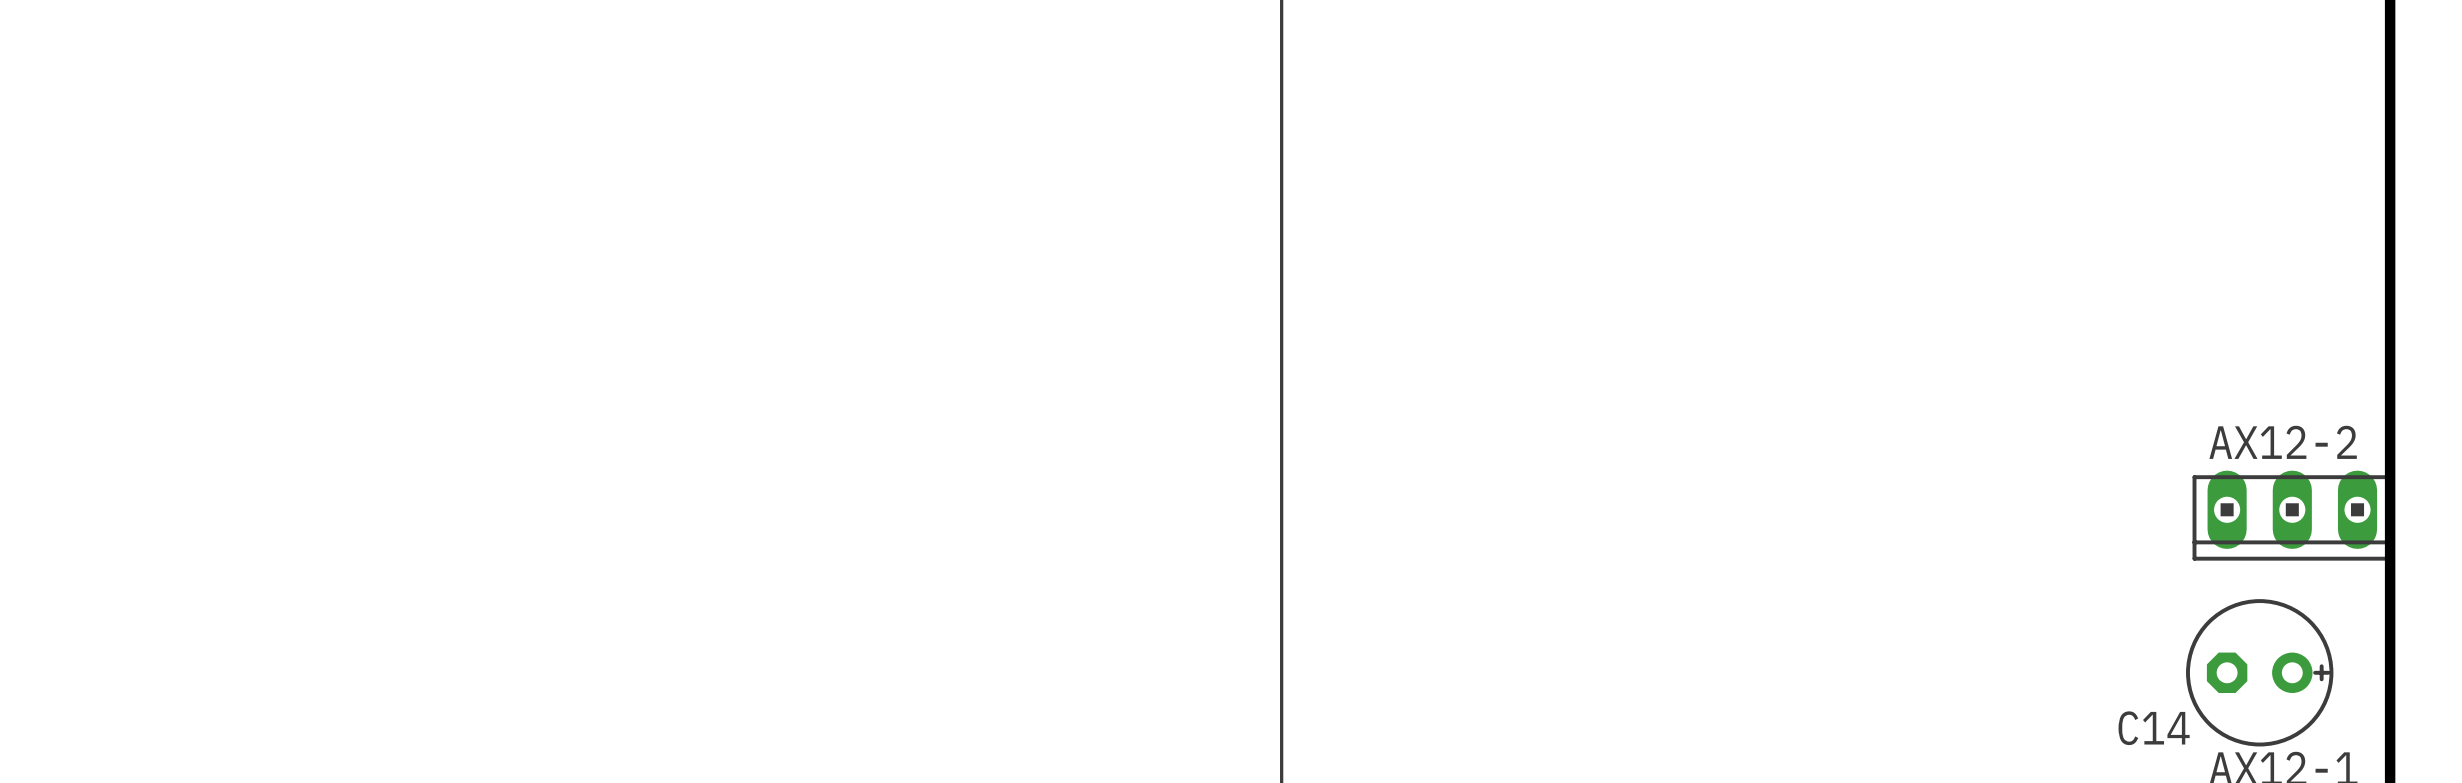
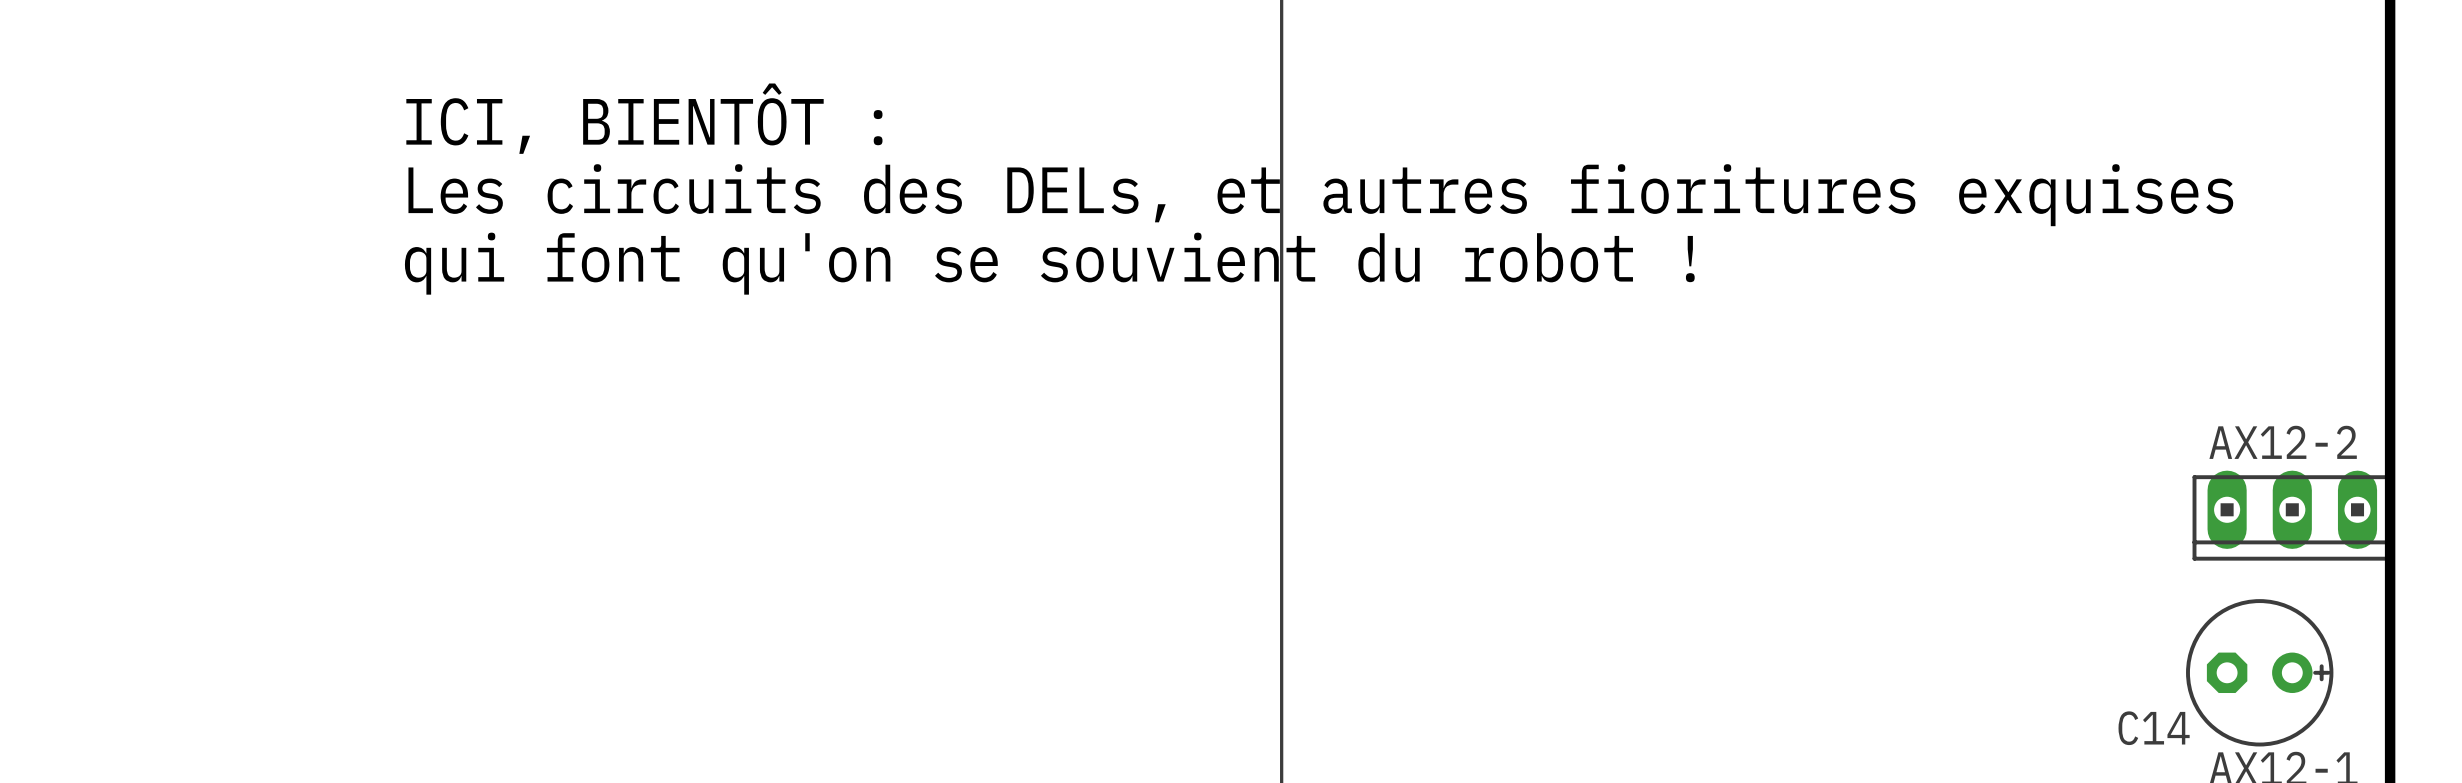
text: none -> ICI, BIENTÔT : (644, 118)
text: none -> Les circuits des DELs, et autres fioritures exquises (1320, 195)
text: none -> qui font qu'on se souvient du robot ! (1049, 263)

